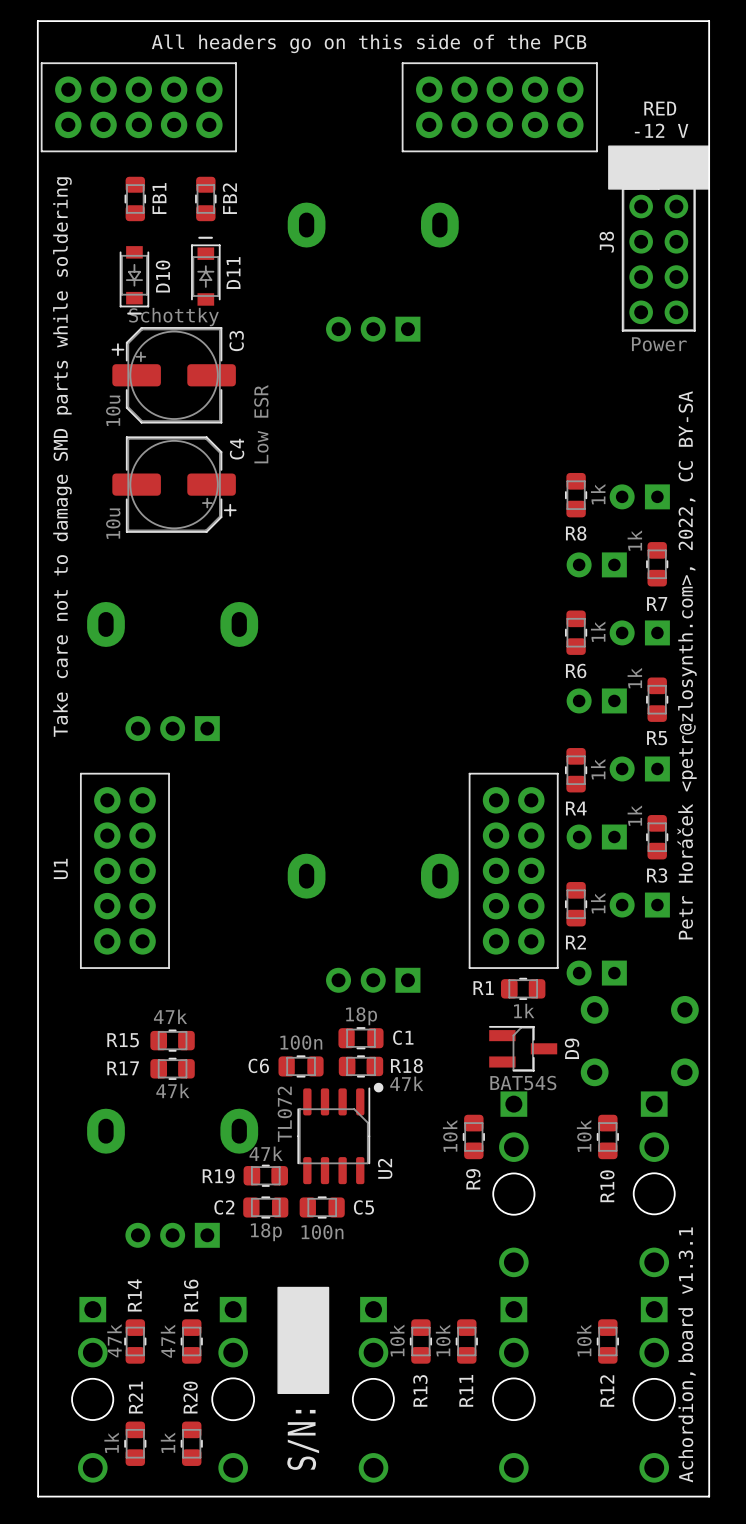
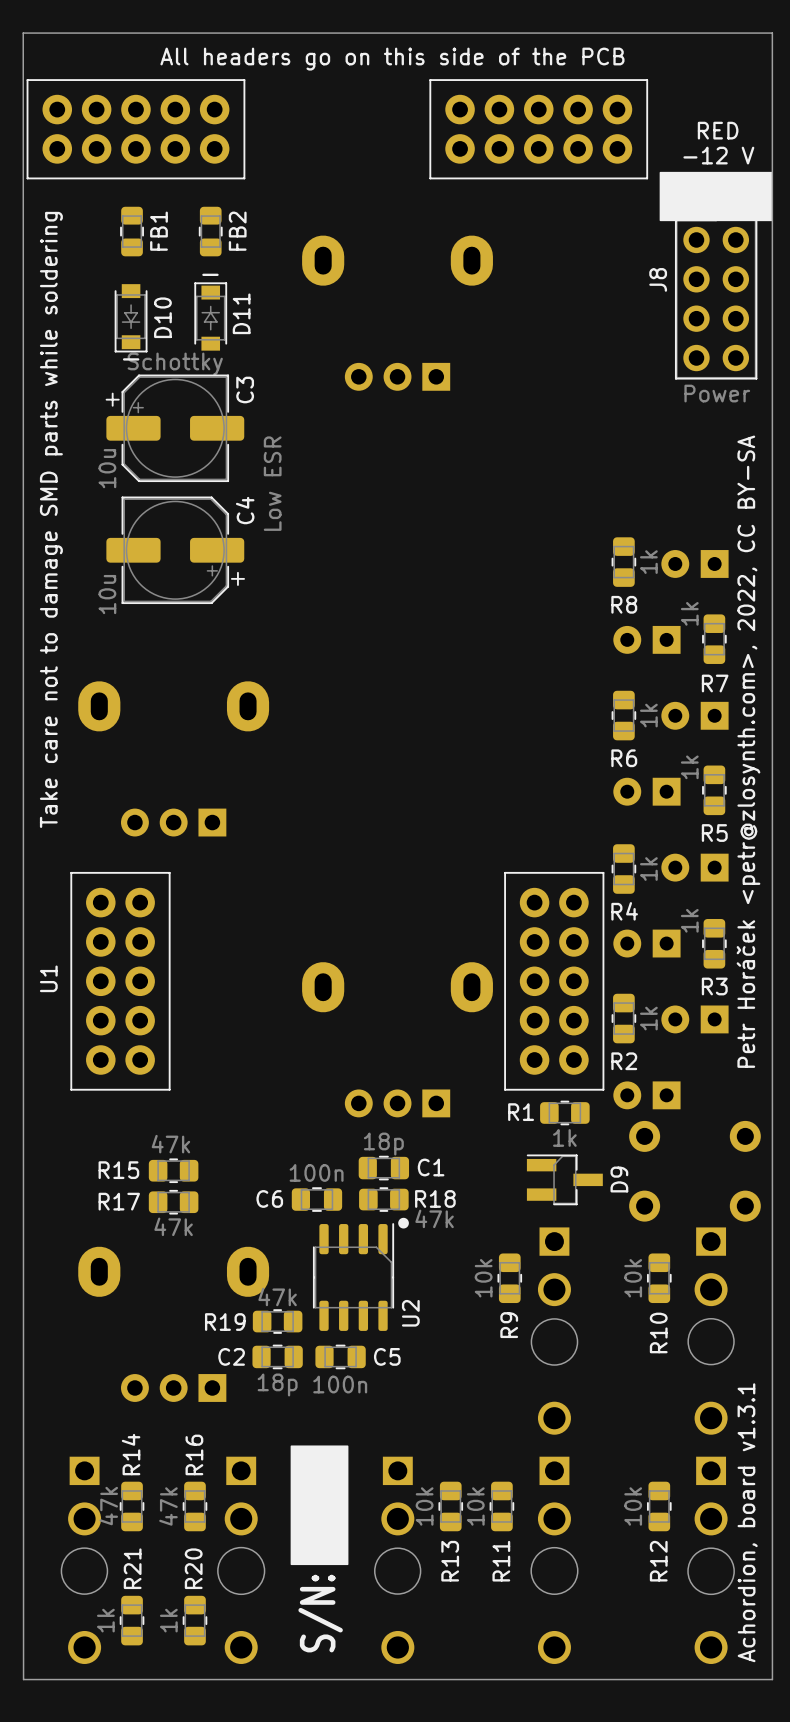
D9 value: BAT54S (523, 1083) -> none
U2 value: TL072 (284, 1114) -> none

